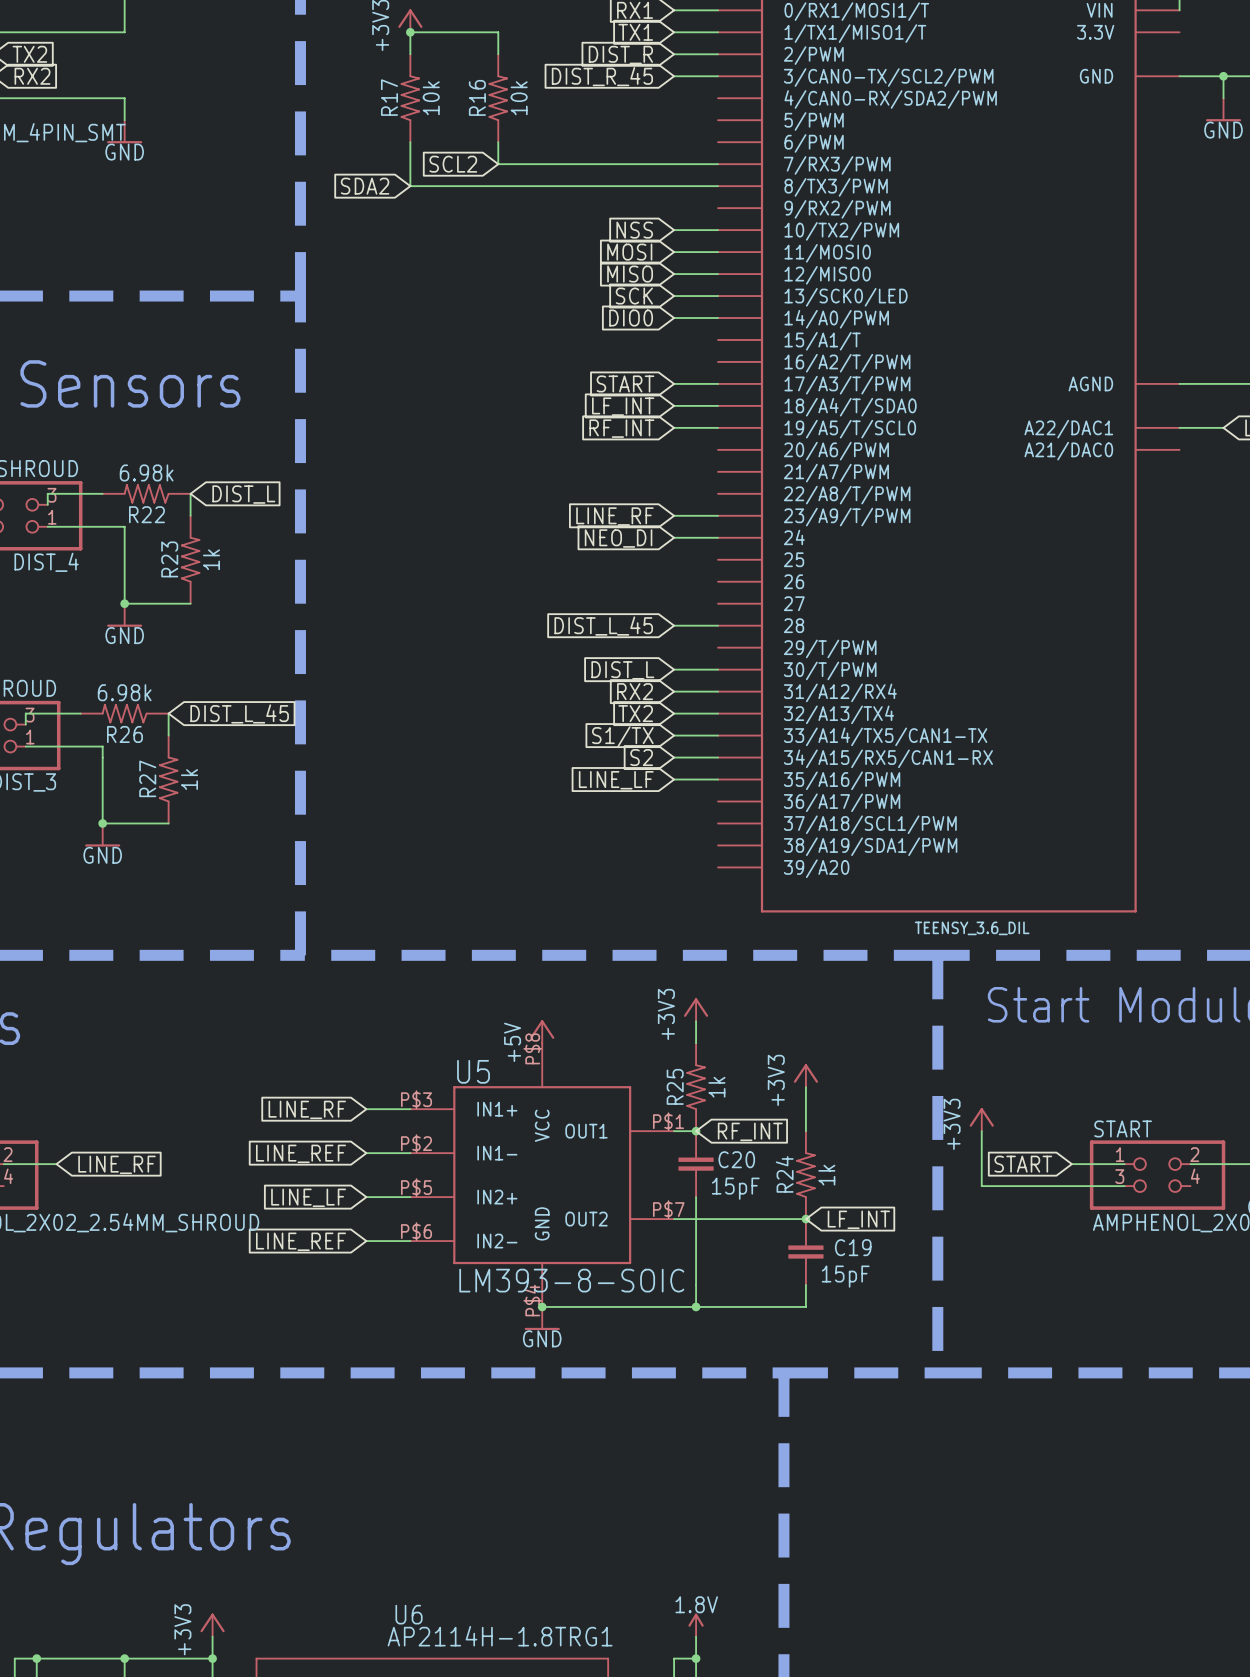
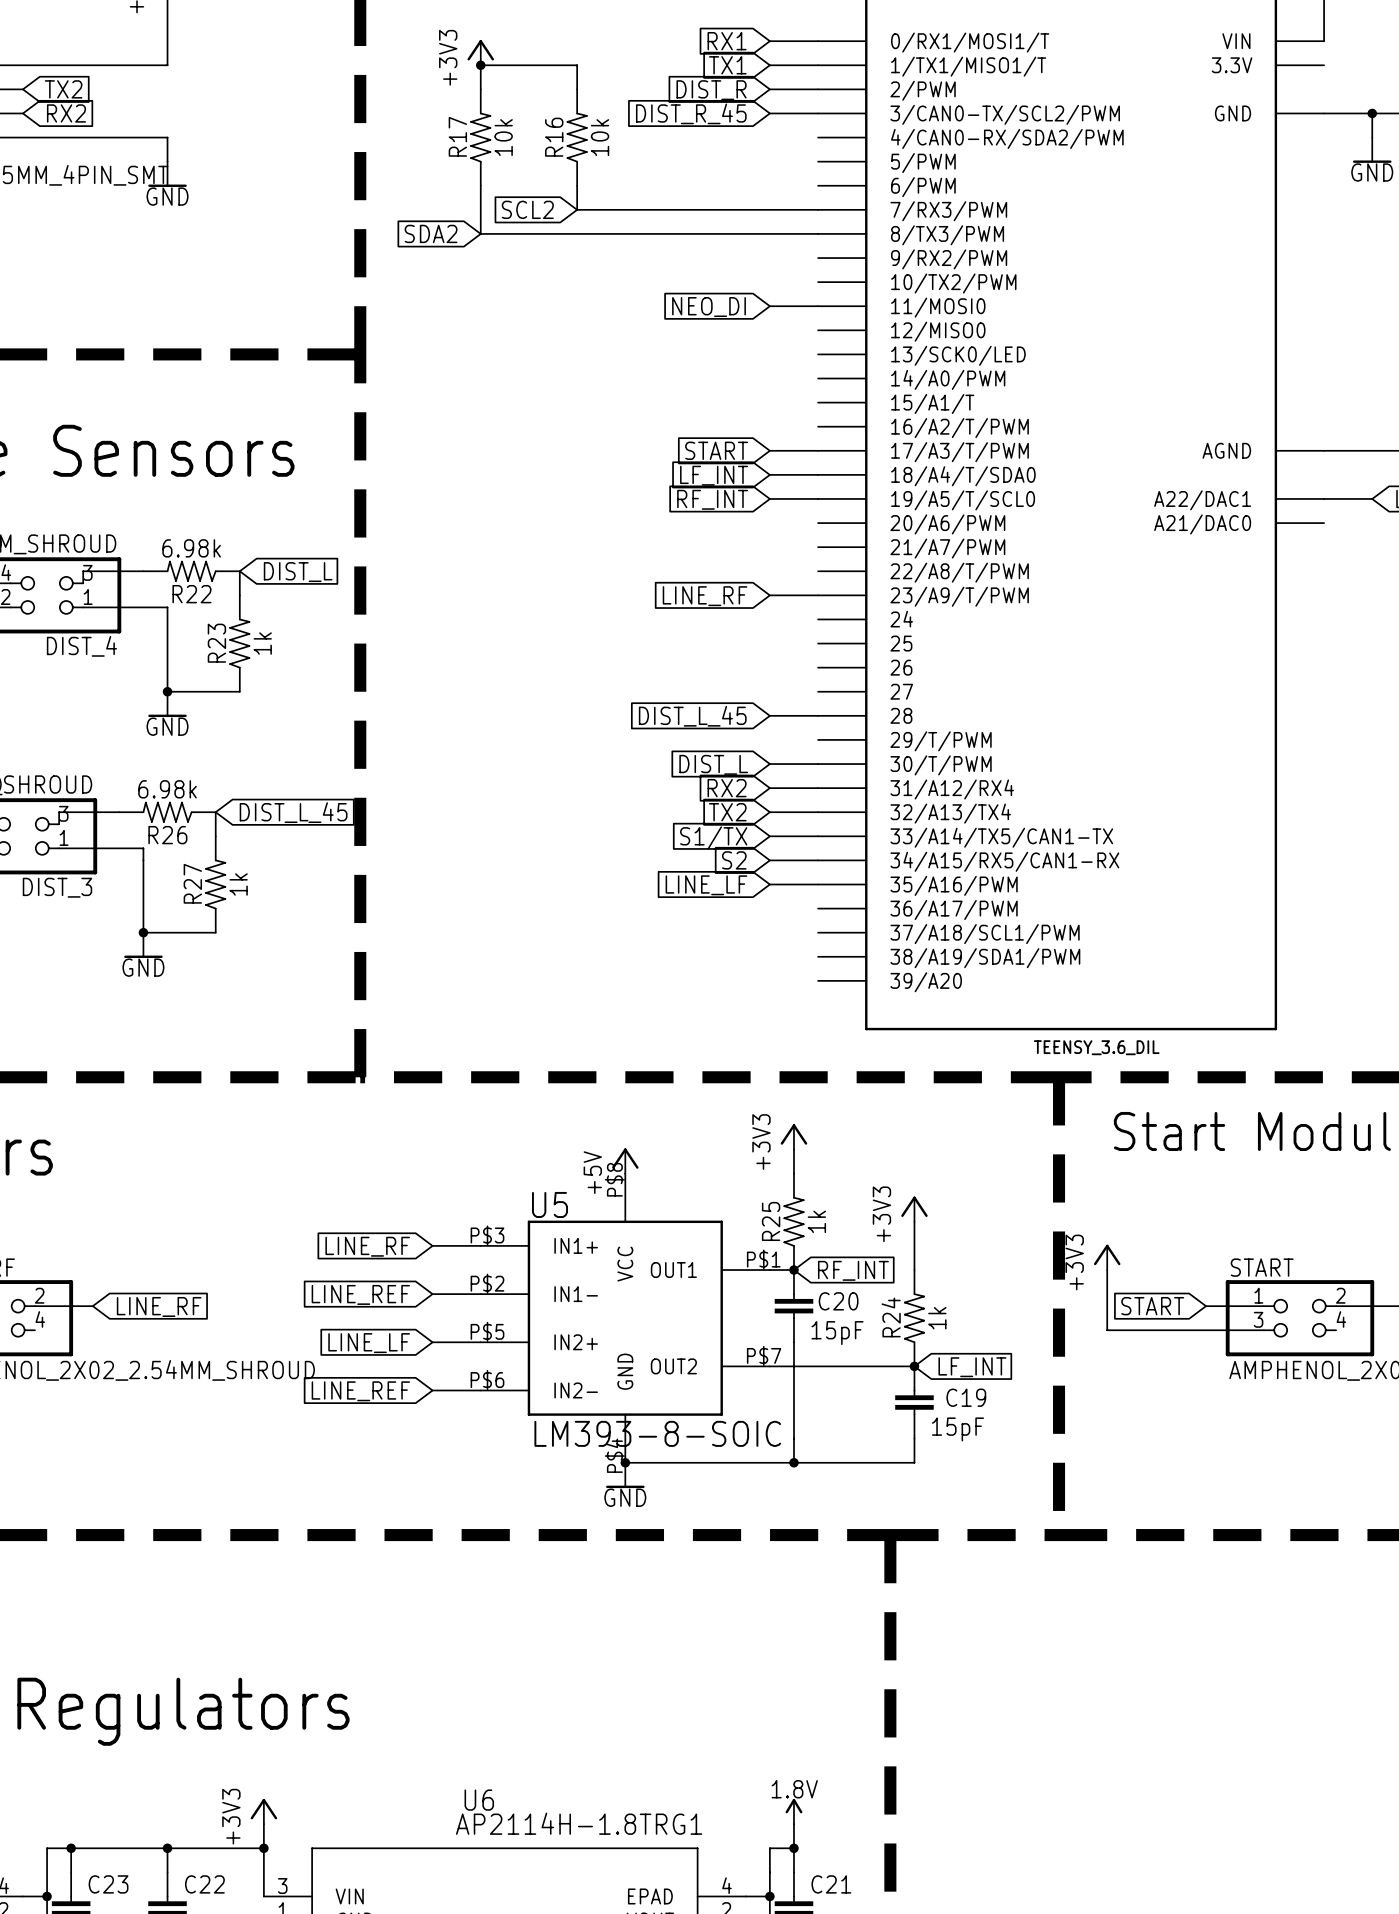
global label: NSS (634, 230) -> none
wire: (674, 230) (718, 230) -> none
global label: MOSI (629, 252) -> NEO_DI (709, 307)
global label: MISO (630, 274) -> none
wire: (674, 274) (718, 274) -> none
global label: SCK (634, 296) -> none
wire: (674, 296) (718, 296) -> none
global label: DIO0 (631, 318) -> none
wire: (674, 318) (718, 318) -> none
wire: (674, 537) (718, 537) -> none
global label: NEO_DI (618, 538) -> none

